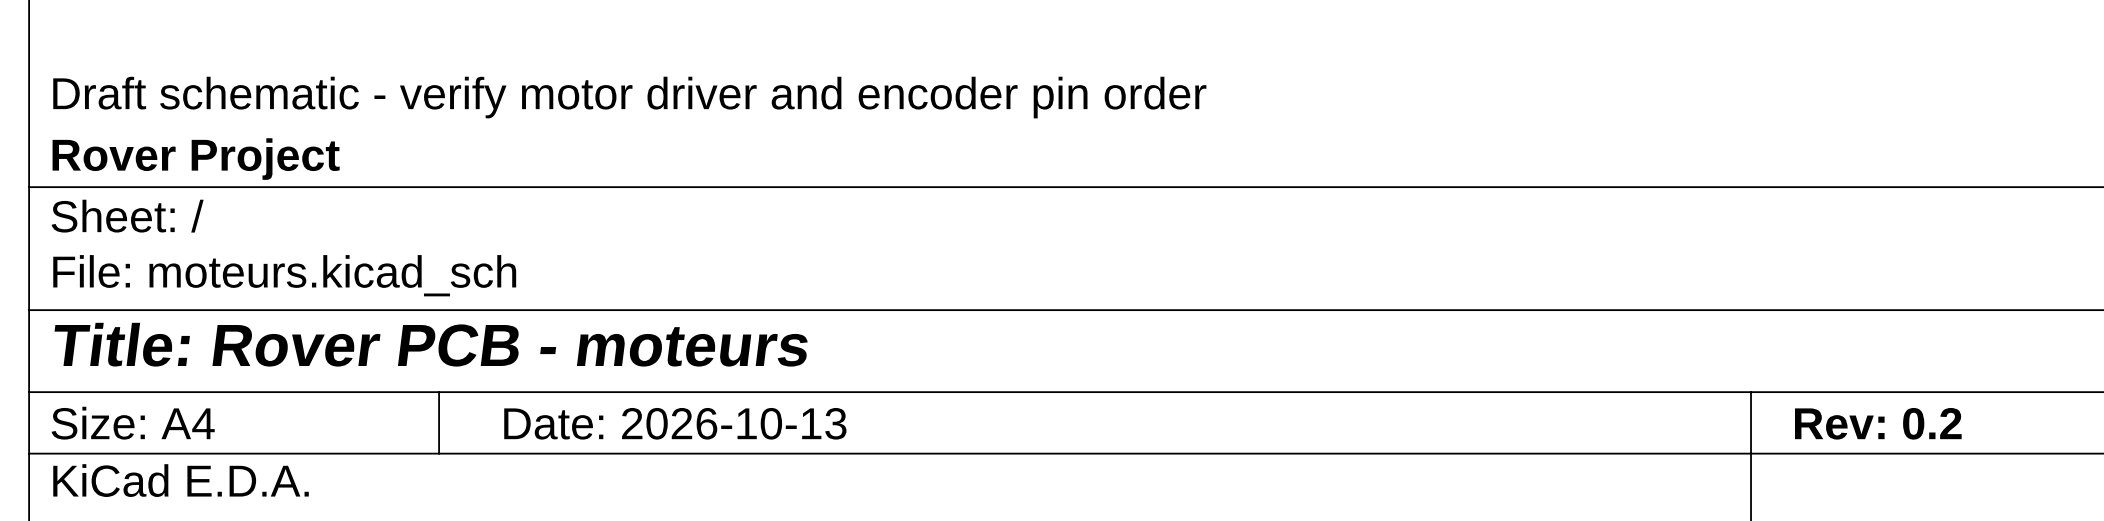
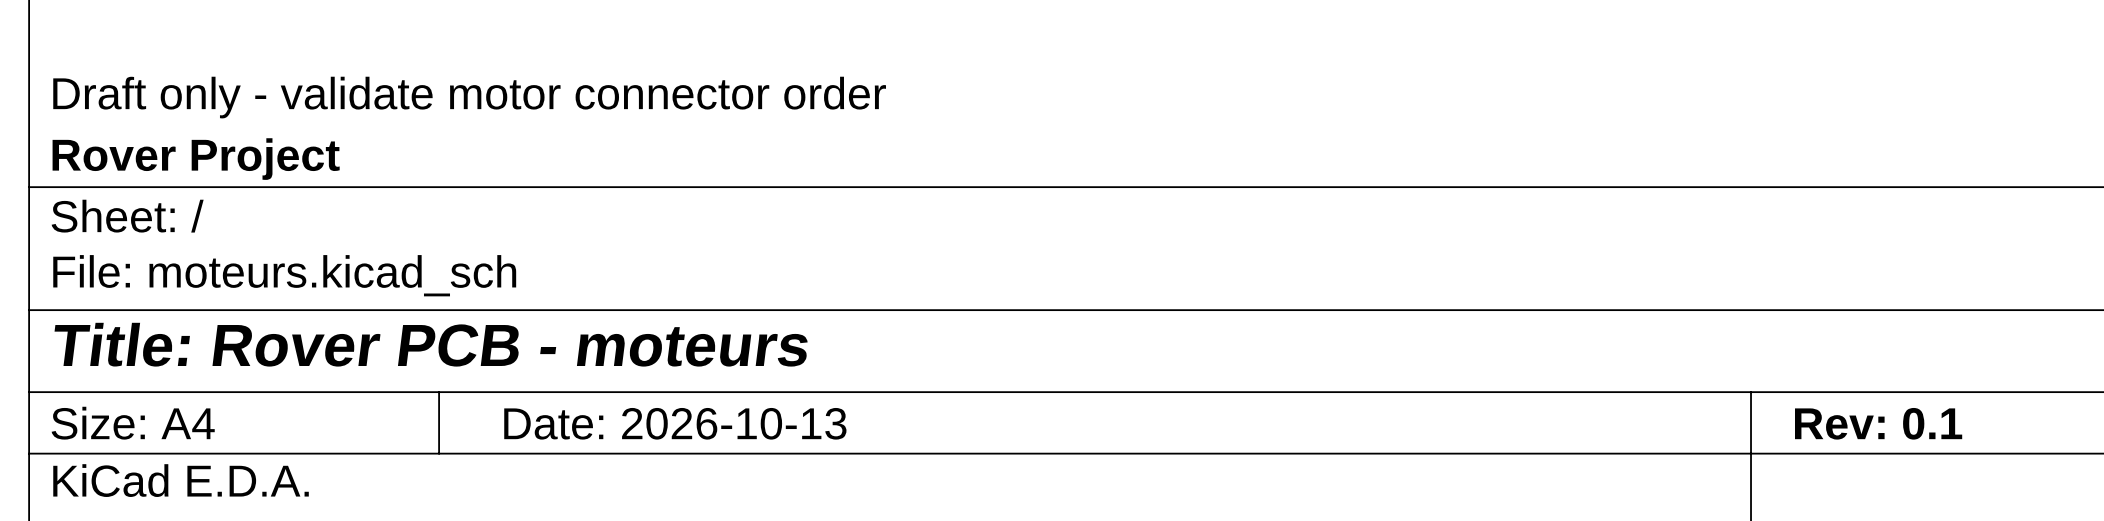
title block: Draft schematic - verify motor driver and encoder pin order (629, 97) -> Draft only - validate motor connector order (469, 97)
title block: Rev: 0.2 (1878, 423) -> Rev: 0.1 (1878, 423)

